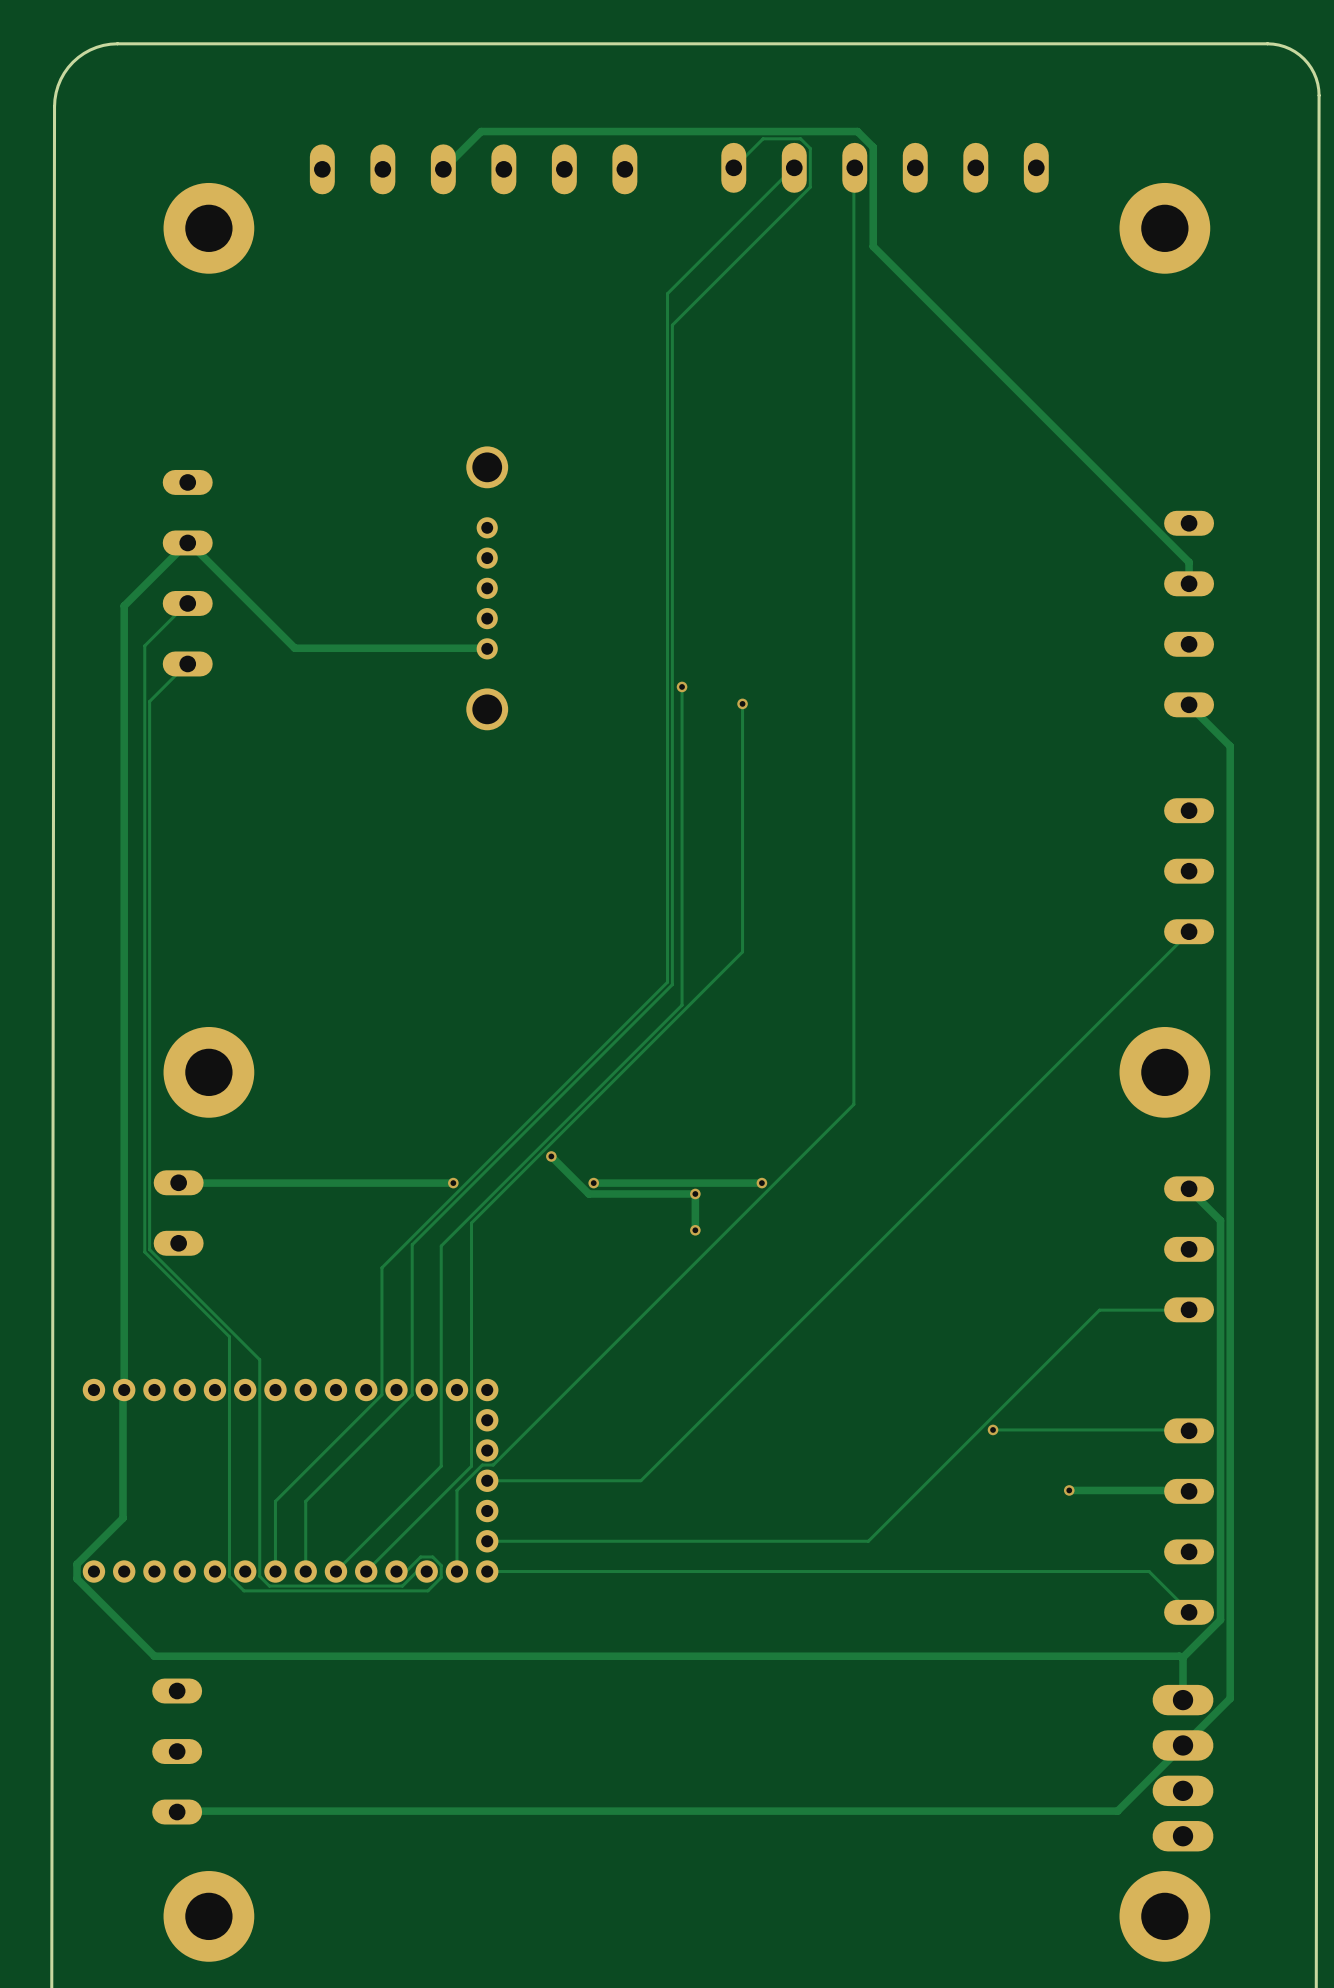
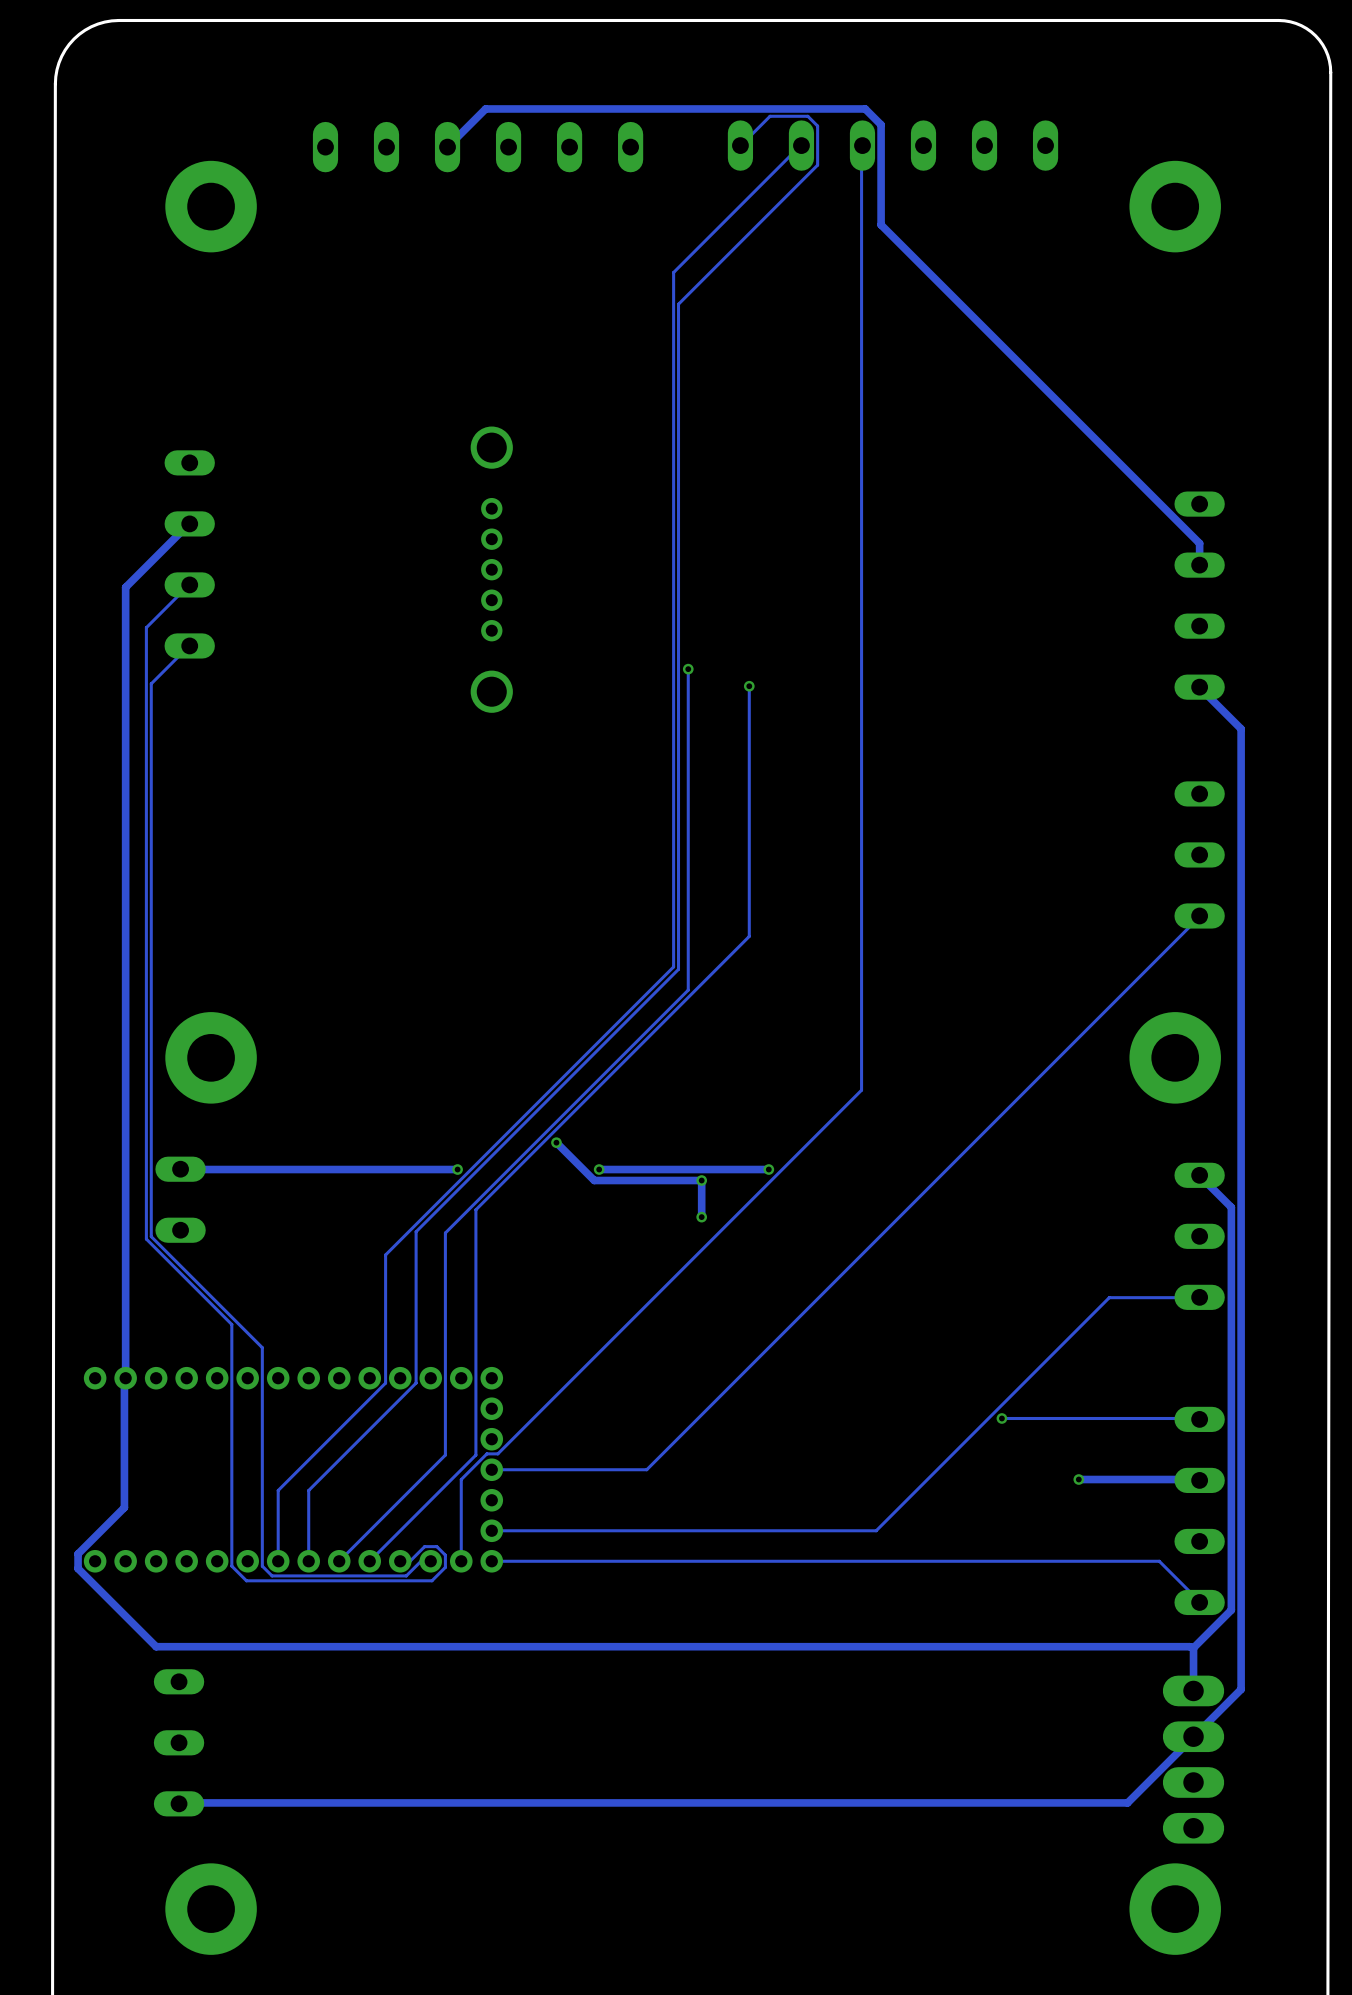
track: (187, 542) (294, 648) (487, 648) -> none

